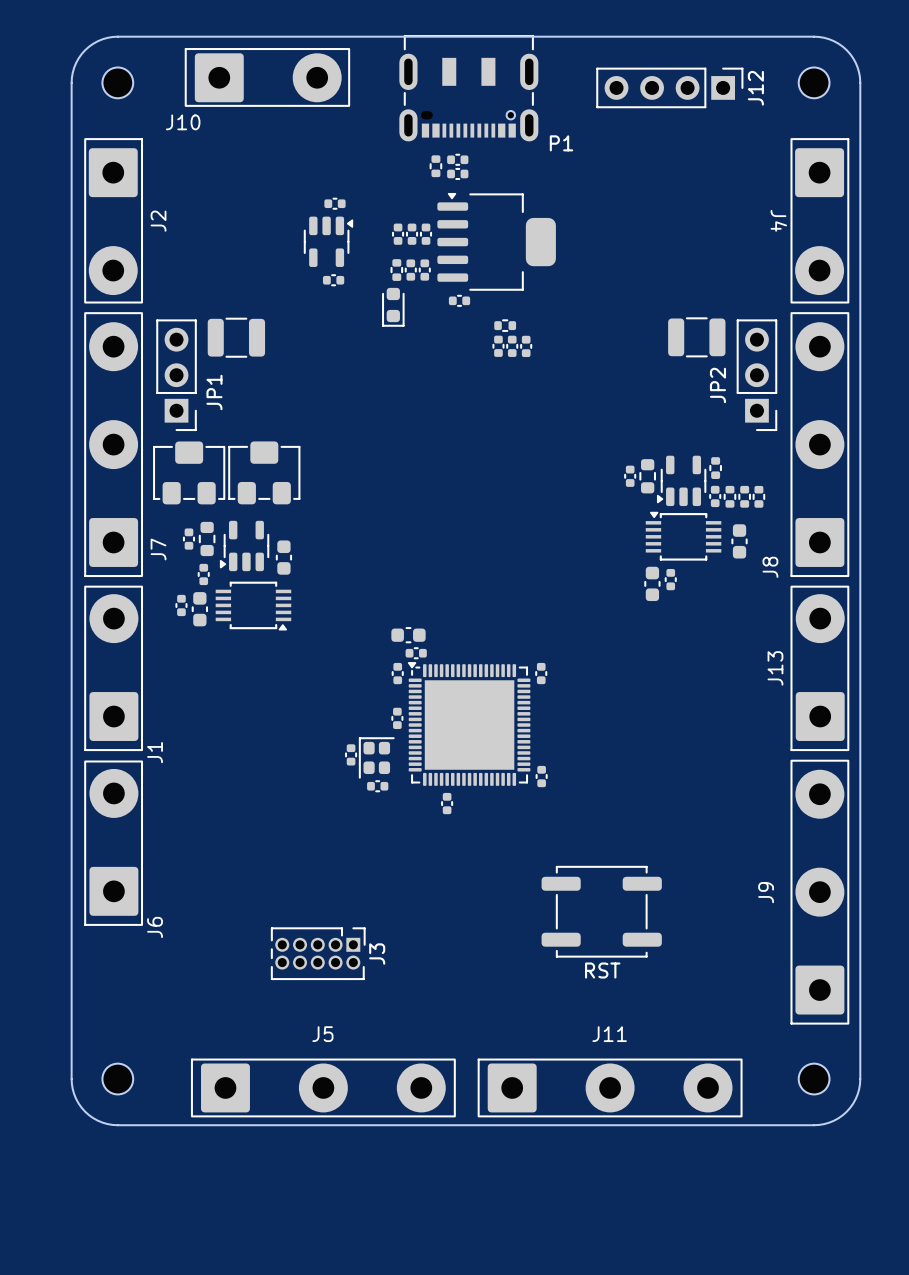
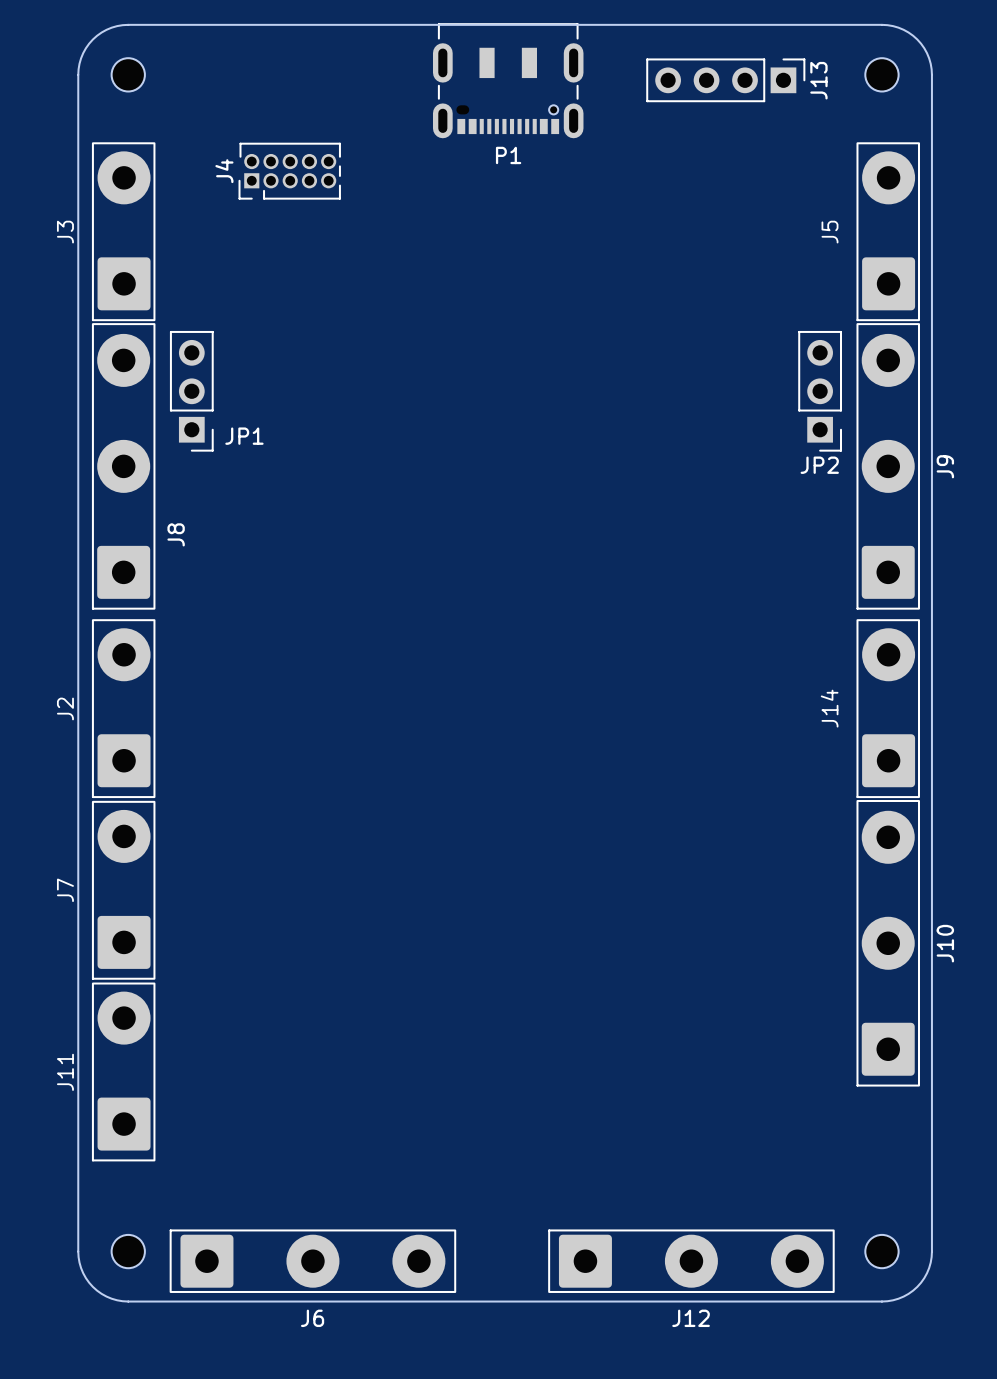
J10 footprint: [185, 48, 350, 107] -> [856, 800, 920, 1087]
J12 name: J12 (755, 88) -> J13 (818, 80)
J10 name position: J10 (183, 122) -> J10 (945, 943)
J4 footprint: [790, 138, 850, 304] -> [238, 142, 341, 200]
P1 name position: P1 (561, 143) -> P1 (508, 155)
part: (457, 159) -> none
part: (435, 166) -> none
part: (457, 173) -> none
part: (335, 203) -> none
J2: (113, 220) -> none
part: (398, 234) -> none
part: (412, 234) -> none
part: (426, 234) -> none
part: (328, 241) -> none
part: (496, 241) -> none
part: (396, 270) -> none
part: (410, 270) -> none
part: (424, 270) -> none
part: (333, 280) -> none
part: (459, 300) -> none
part: (393, 307) -> none
part: (505, 325) -> none
part: (236, 337) -> none
part: (696, 337) -> none
part: (498, 346) -> none
part: (512, 346) -> none
part: (526, 346) -> none
JP2 name rotation: 0° (717, 385) -> 90° clockwise (819, 465)
JP2 name position: JP2 (717, 385) -> JP2 (819, 465)
JP1 name rotation: 0° (214, 392) -> 90° clockwise (244, 436)
part: (715, 468) -> none
part: (189, 472) -> none
part: (264, 472) -> none
part: (630, 476) -> none
part: (647, 476) -> none
part: (681, 480) -> none
part: (715, 496) -> none
part: (729, 496) -> none
part: (744, 496) -> none
part: (758, 496) -> none
part: (683, 536) -> none
part: (207, 538) -> none
part: (188, 539) -> none
part: (739, 541) -> none
part: (244, 545) -> none
J7 name: J7 (158, 549) -> J8 (176, 534)
part: (283, 557) -> none
J8 name: J8 (770, 567) -> J9 (945, 466)
part: (203, 574) -> none
part: (670, 579) -> none
part: (652, 583) -> none
part: (181, 605) -> none
part: (253, 606) -> none
part: (199, 609) -> none
part: (408, 635) -> none
part: (416, 653) -> none
J13 name: J13 (775, 668) -> J14 (829, 708)
part: (397, 673) -> none
part: (541, 673) -> none
part: (397, 718) -> none
part: (469, 723) -> none
J1 name: J1 (155, 752) -> J2 (65, 708)
part: (351, 754) -> none
part: (376, 757) -> none
J6 footprint: [84, 760, 143, 926] -> [169, 1229, 456, 1293]
part: (541, 776) -> none
part: (377, 786) -> none
part: (447, 803) -> none
J7: none -> (123, 890)
J9: (819, 892) -> none
RST: (601, 911) -> none
J6 name position: J6 (155, 927) -> J6 (312, 1318)
J3 footprint: [271, 927, 366, 980] -> [92, 142, 156, 321]
J3 name position: J3 (377, 954) -> J3 (65, 232)
J5 name position: J5 (322, 1034) -> J5 (829, 232)
J11 name position: J11 (609, 1034) -> J11 (65, 1072)
J5 footprint: [191, 1058, 456, 1118] -> [856, 142, 920, 321]
J11 footprint: [477, 1058, 743, 1118] -> [92, 982, 156, 1162]
board edge: (71, 1079) (74, 1094) (85, 1111) (102, 1122) (117, 1125) (819, 1124) (834, 1120) (846, 1111) (855, 1099) (860, 1079) -> (78, 1153) (78, 1251) (81, 1268) (85, 1278) (97, 1290) (111, 1298) (128, 1301) (893, 1300) (908, 1293) (917, 1286) (924, 1278) (930, 1262) (931, 1153)
part position: (117, 1079) -> (128, 1251)
part position: (814, 1079) -> (881, 1251)
J12: none -> (691, 1261)

